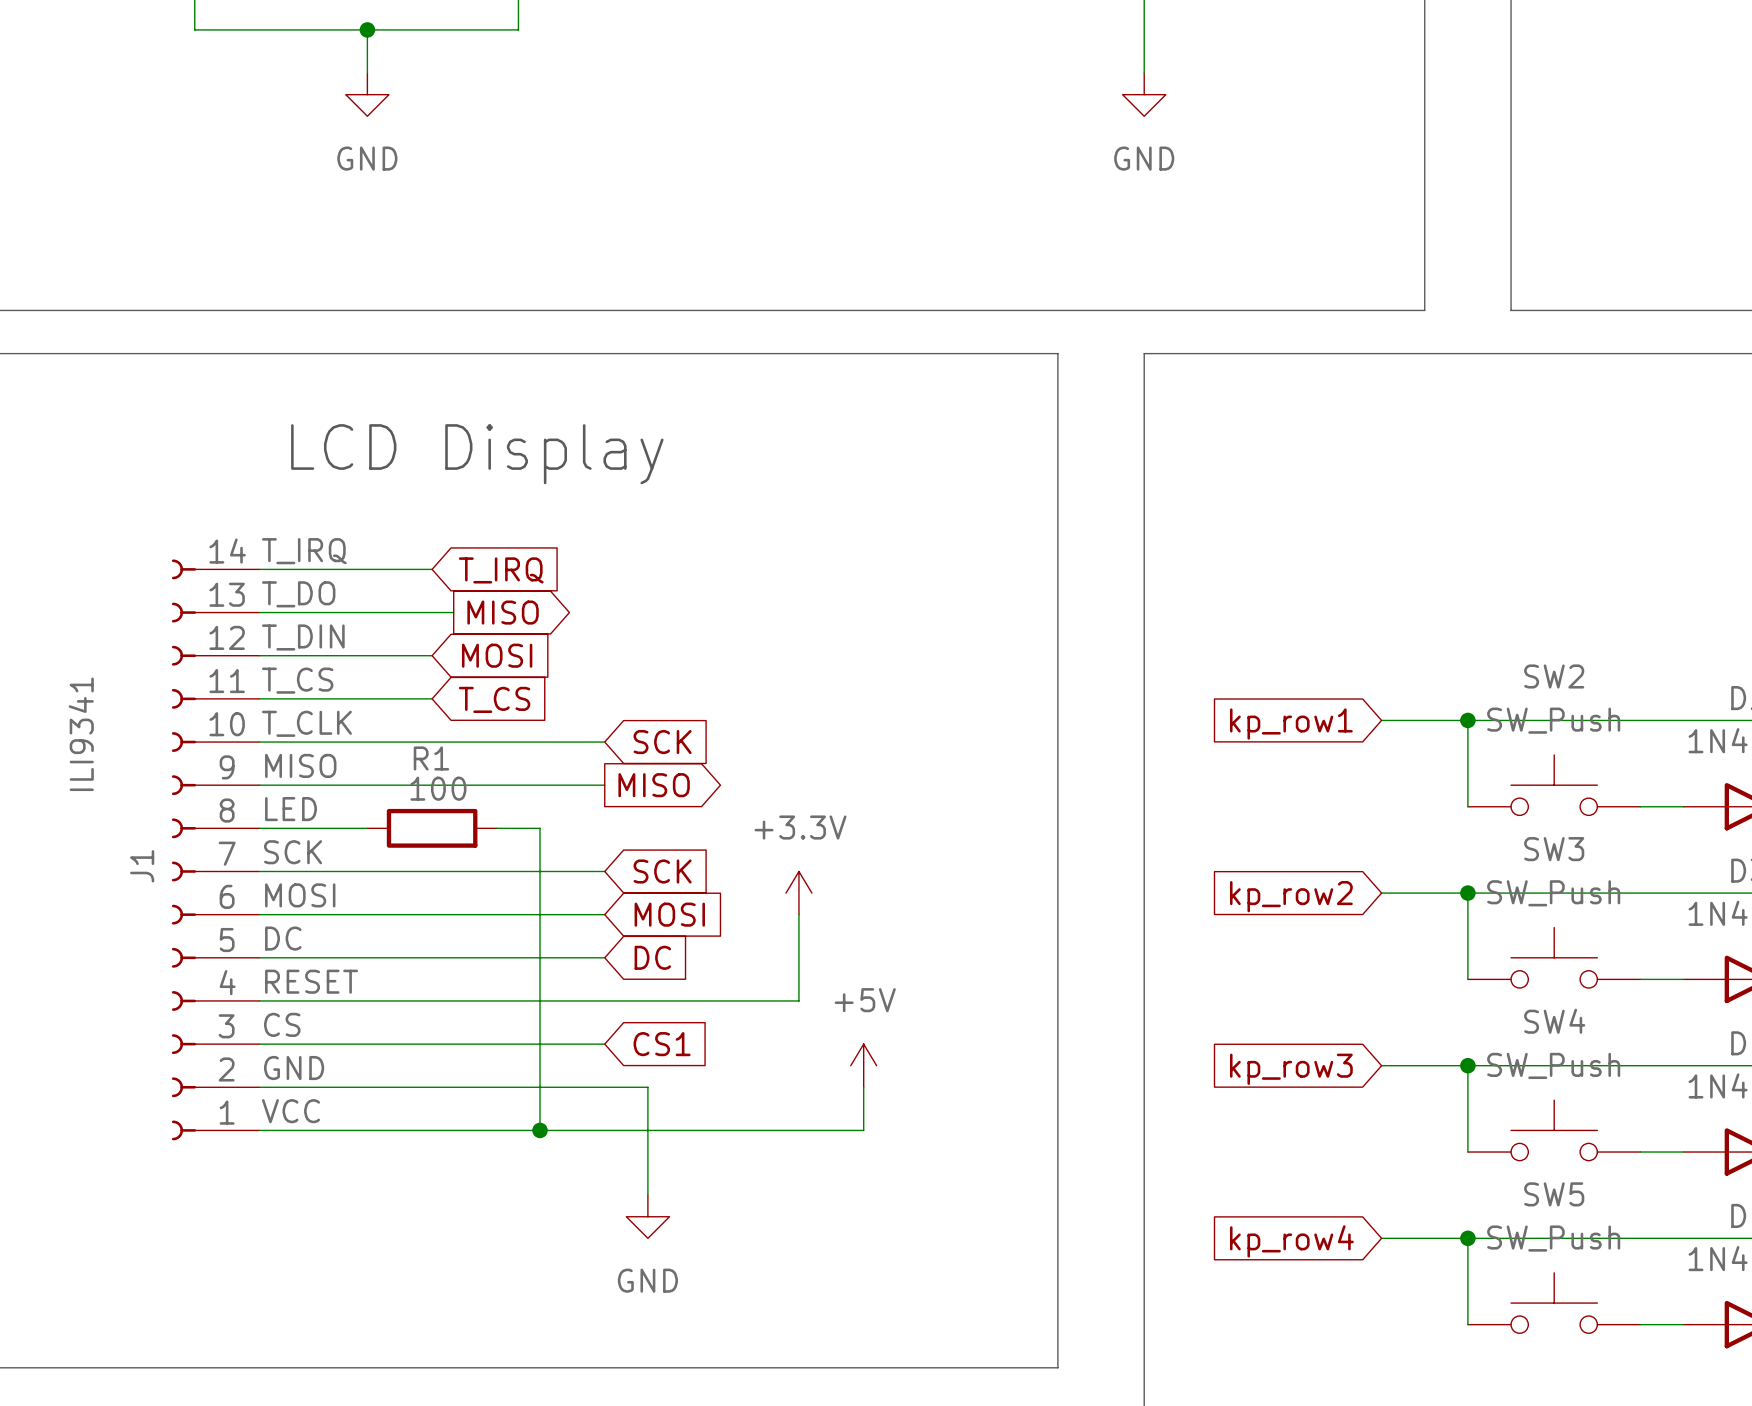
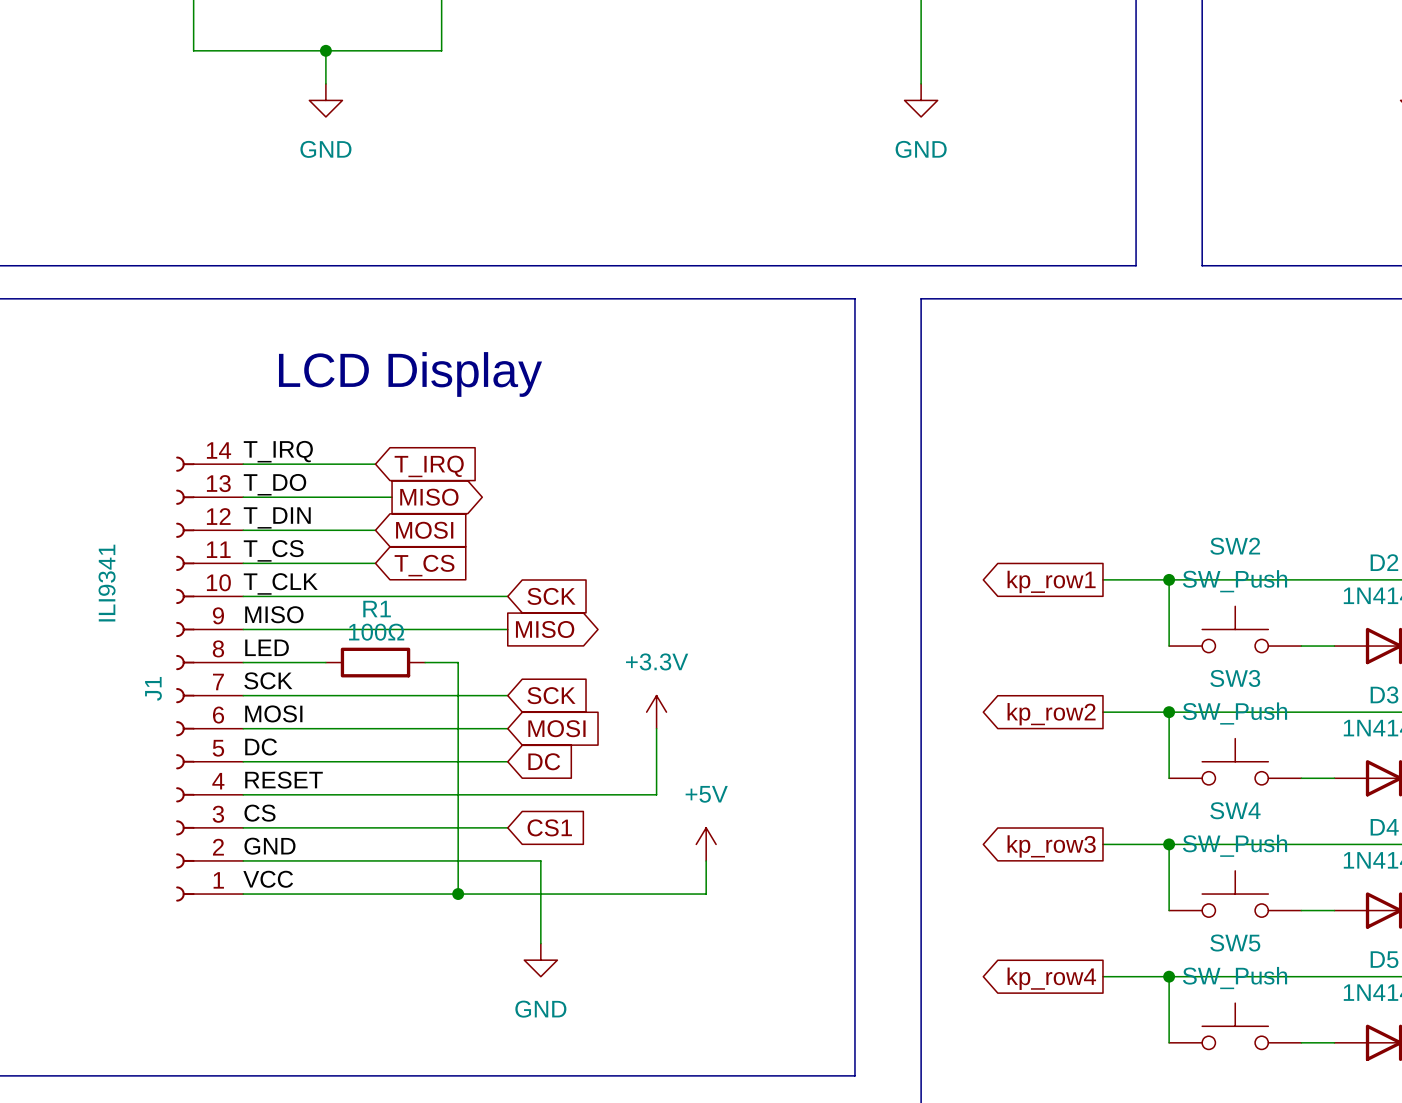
global label shape: input (1291, 724) -> output (1051, 581)
R1 value: 100 (438, 788) -> 100Ω (376, 632)
global label shape: input (1291, 896) -> output (1051, 714)
global label shape: input (1291, 1069) -> output (1051, 846)
global label shape: input (1291, 1241) -> output (1051, 978)

